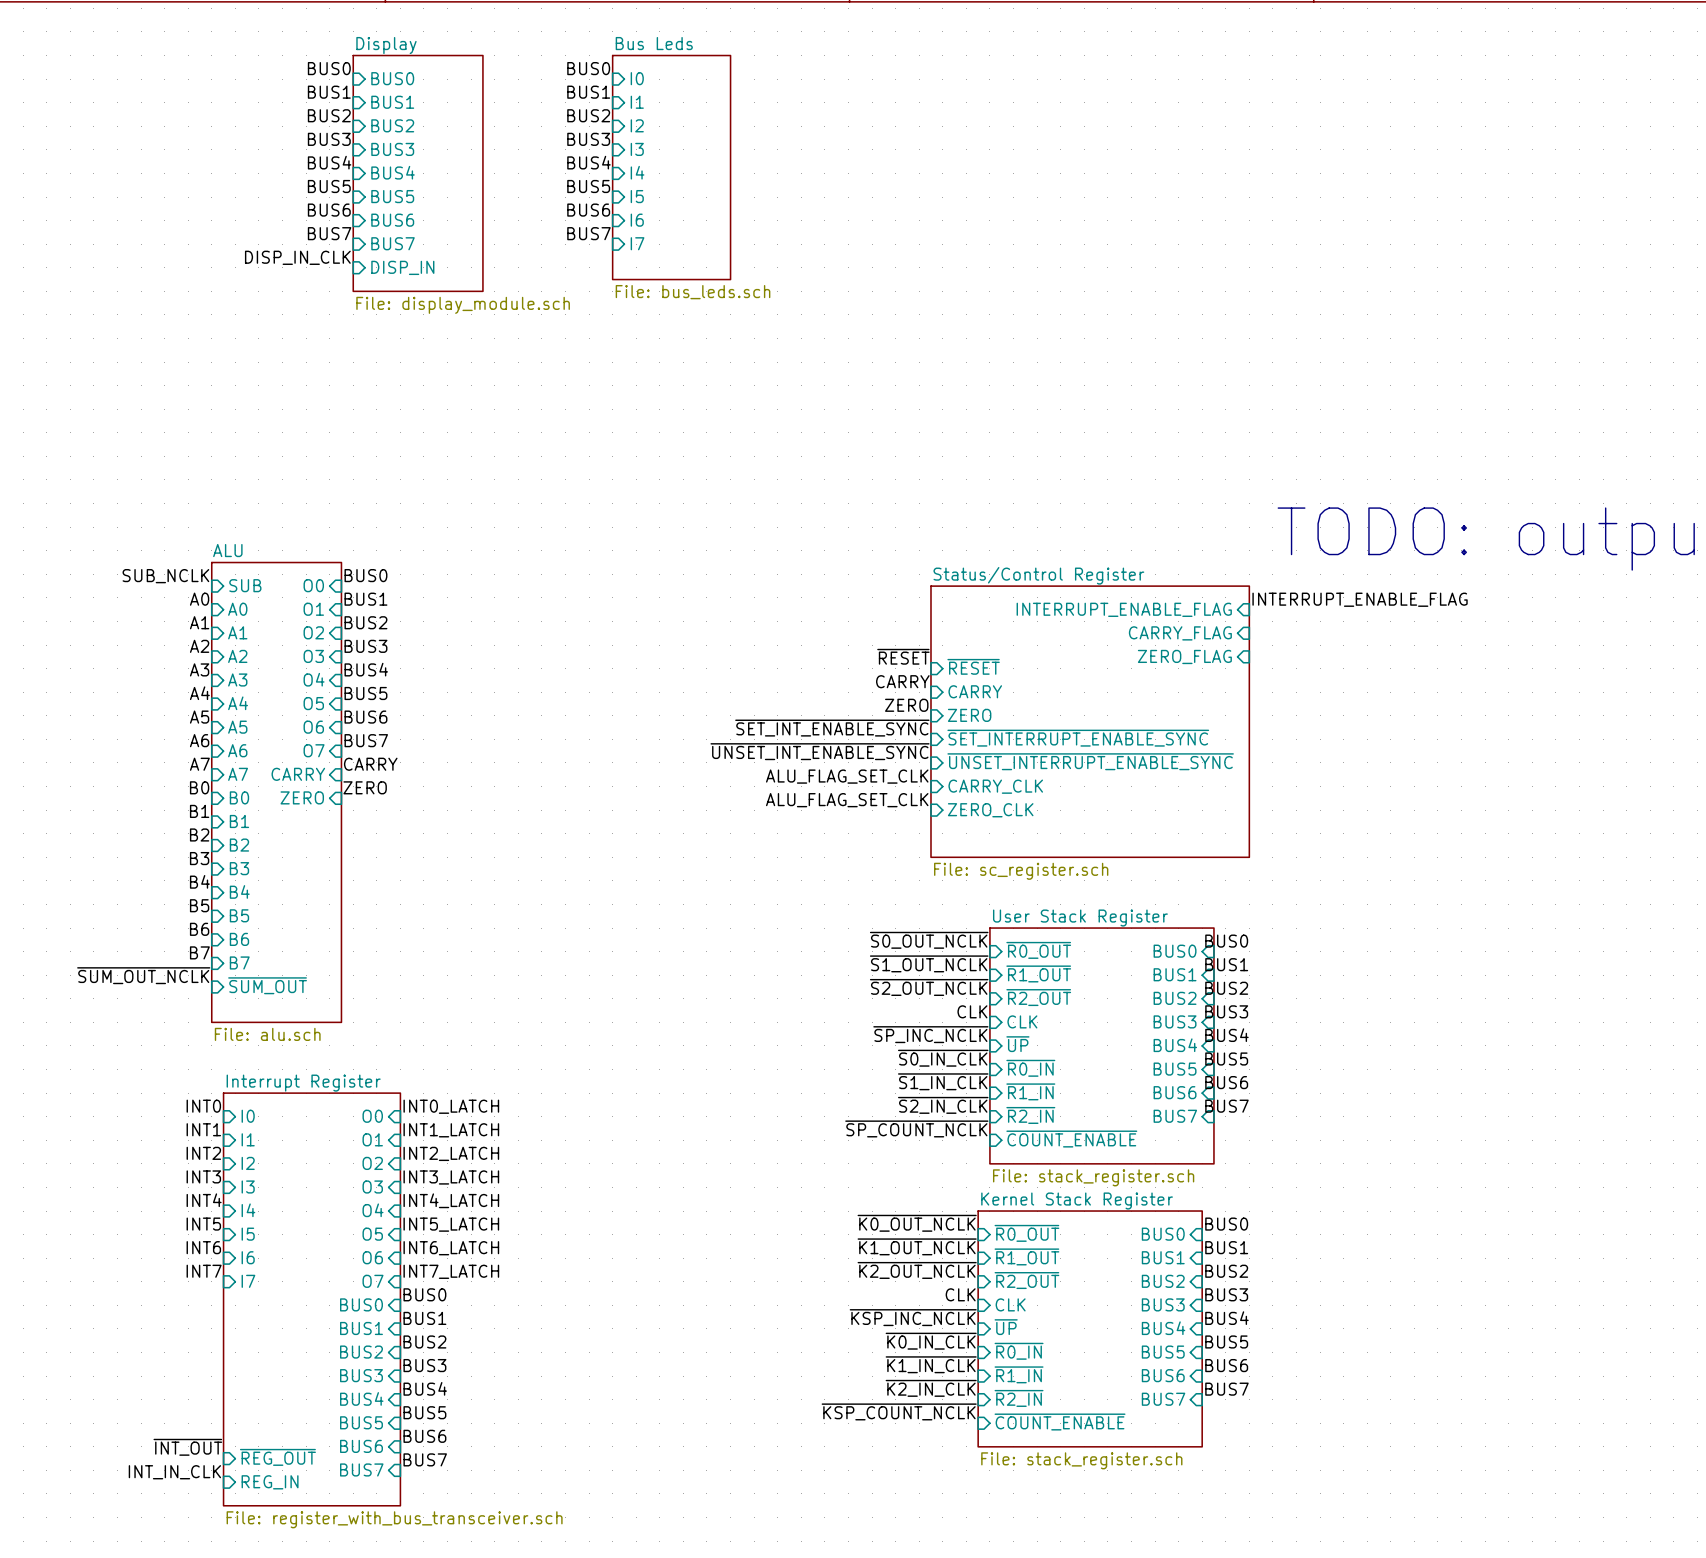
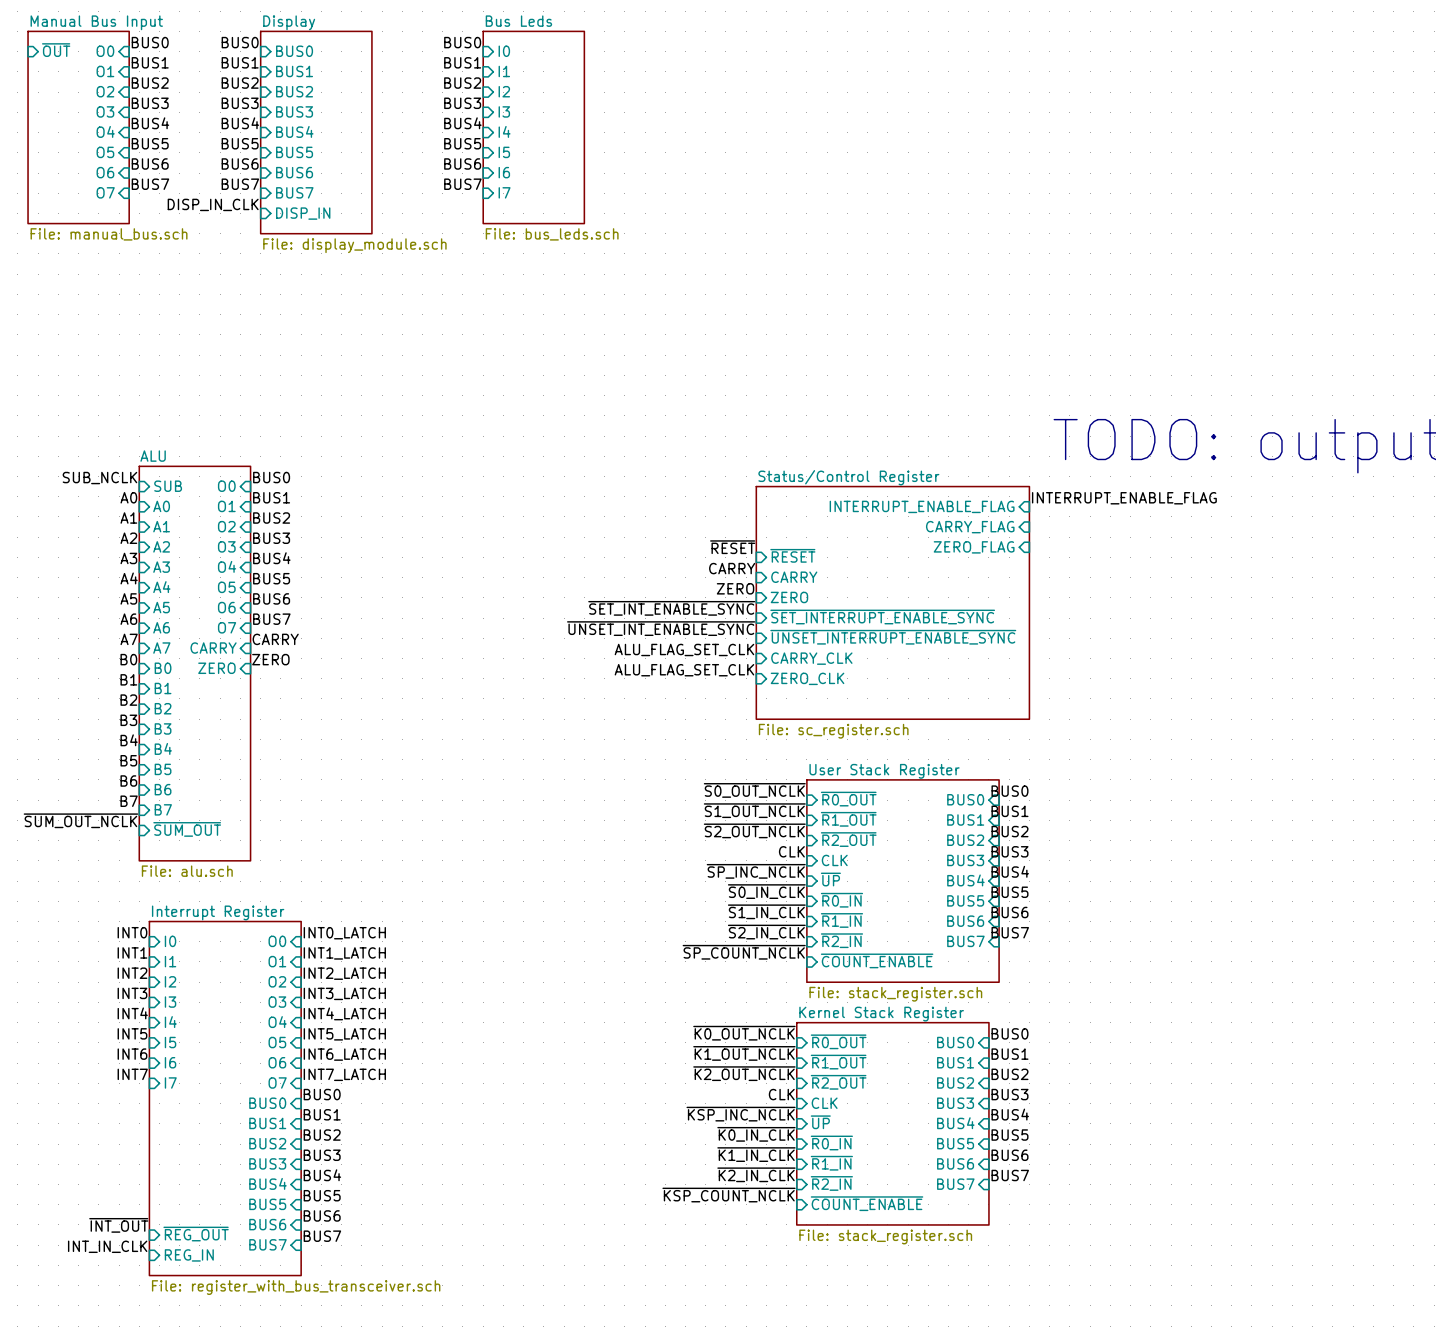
label: none -> BUS0 (150, 42)
sheet pin: none -> ~{OUT} (56, 50)
sheet pin: none -> O0 (105, 51)
label: none -> BUS1 (150, 62)
sheet pin: none -> O1 (105, 71)
label: none -> BUS2 (150, 83)
sheet pin: none -> O2 (105, 91)
label: none -> BUS3 (150, 103)
sheet pin: none -> O3 (105, 111)
label: none -> BUS4 (150, 123)
sheet Manual Bus Input: none -> File: manual_bus.sch (78, 127)
sheet pin: none -> O4 (105, 131)
label: none -> BUS5 (150, 143)
sheet pin: none -> O5 (105, 152)
label: none -> BUS6 (150, 163)
sheet pin: none -> O6 (105, 172)
label: none -> BUS7 (150, 184)
sheet pin: none -> O7 (105, 192)

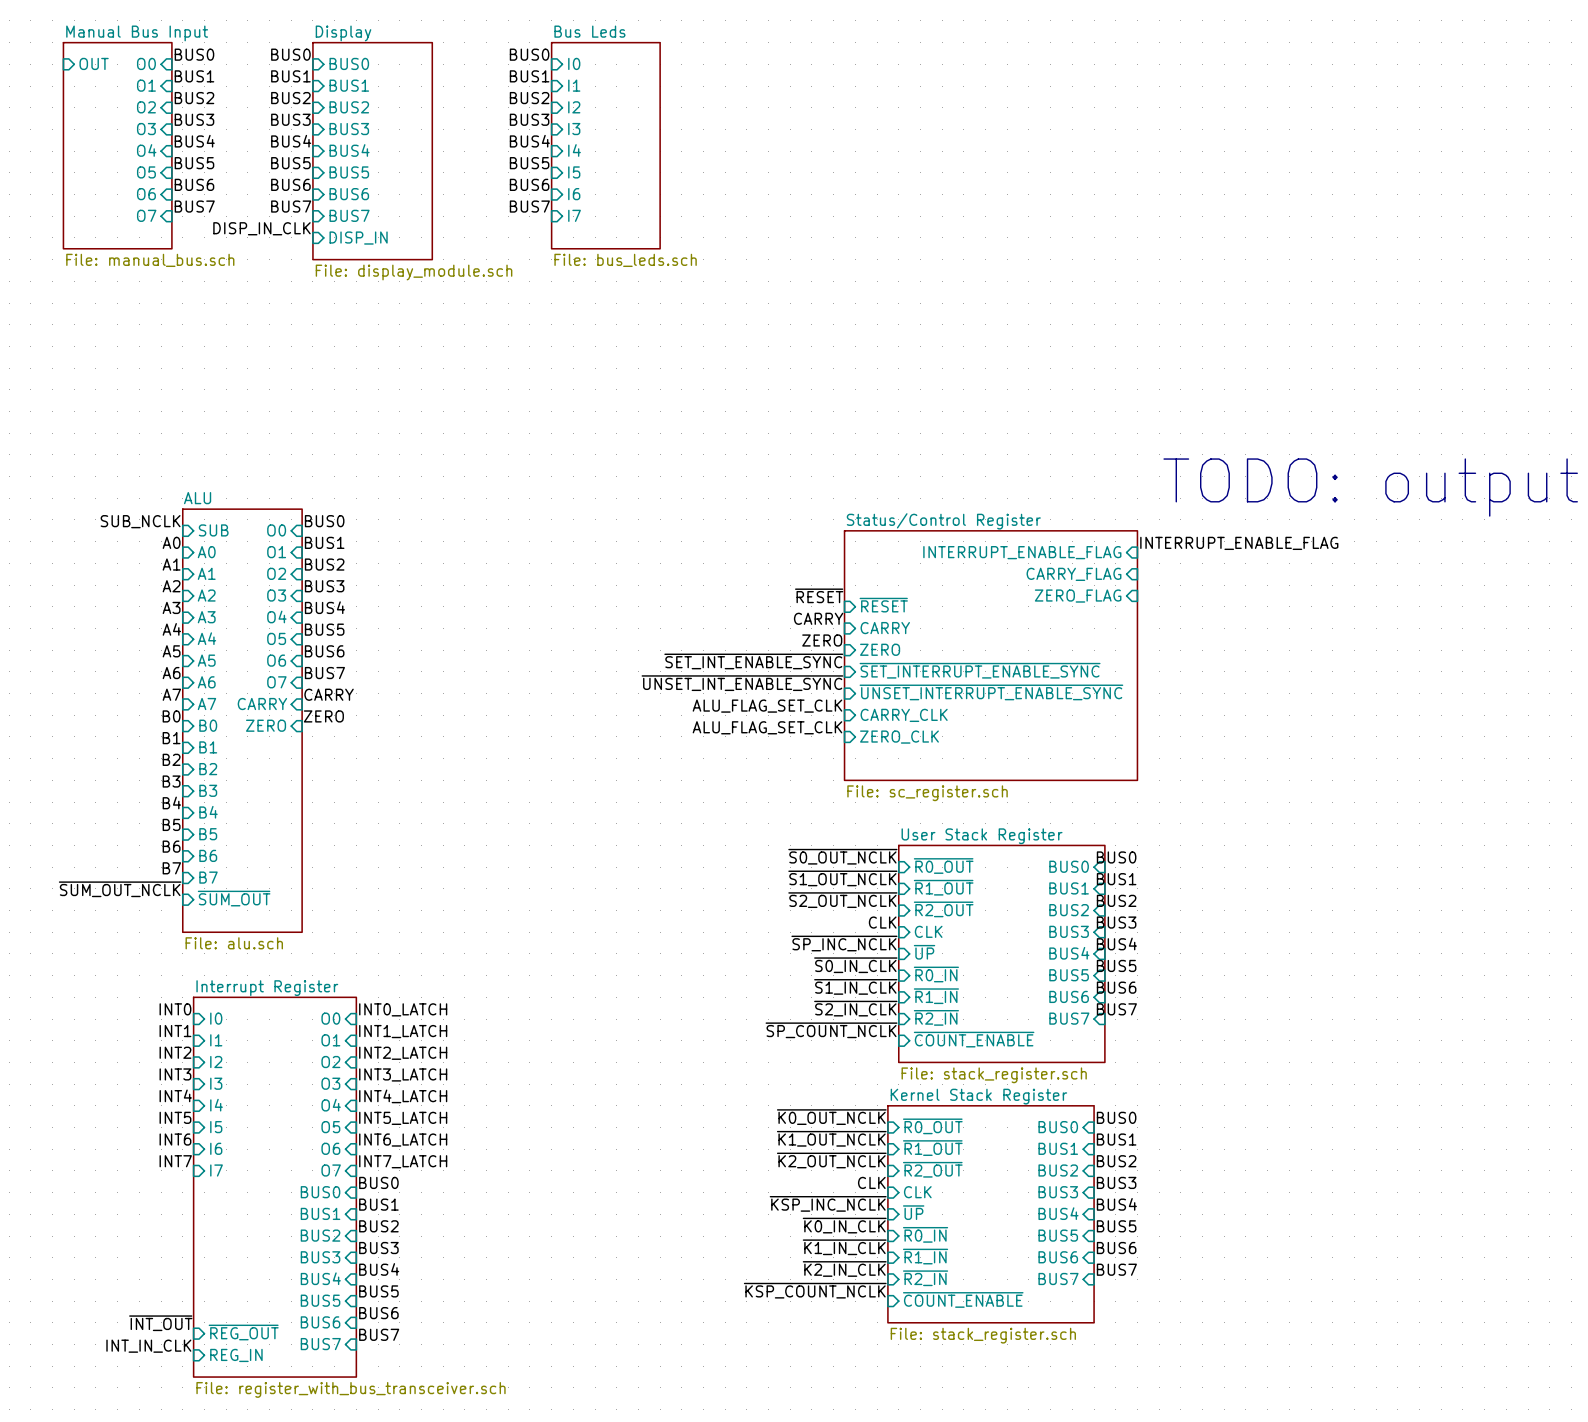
sheet pin: ~{OUT} (56, 50) -> OUT (94, 63)

